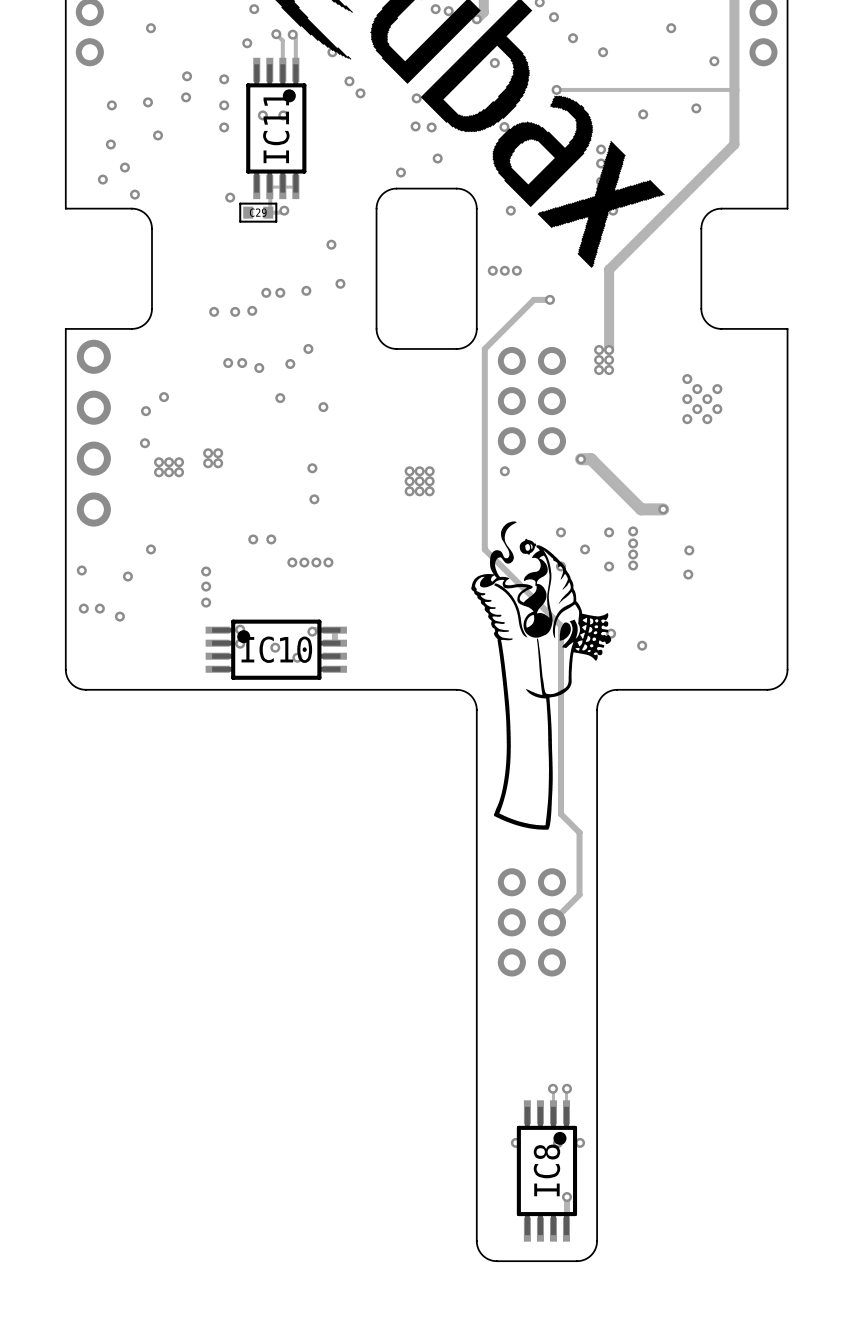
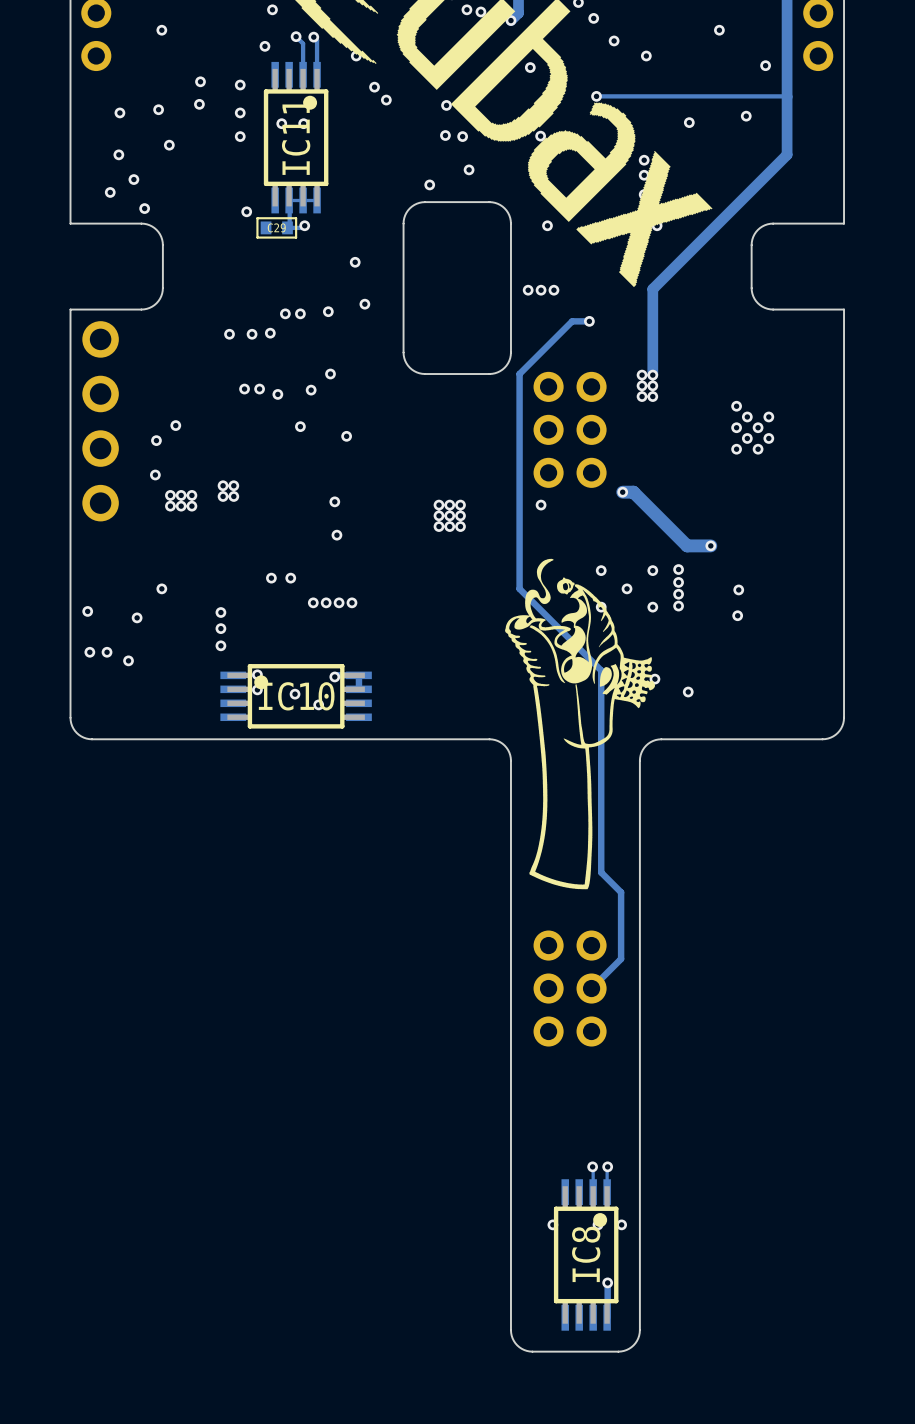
board edge: (151, 268) (151, 311) (149, 318) (144, 324) (131, 328) (65, 328) -> (162, 288) (158, 301) (146, 308) (70, 309) (70, 352)
board edge: (701, 268) (701, 311) (704, 318) (709, 324) (721, 328) (787, 328) -> (751, 288) (756, 301) (767, 308) (844, 309) (844, 352)
part position: (93, 433) -> (100, 421)

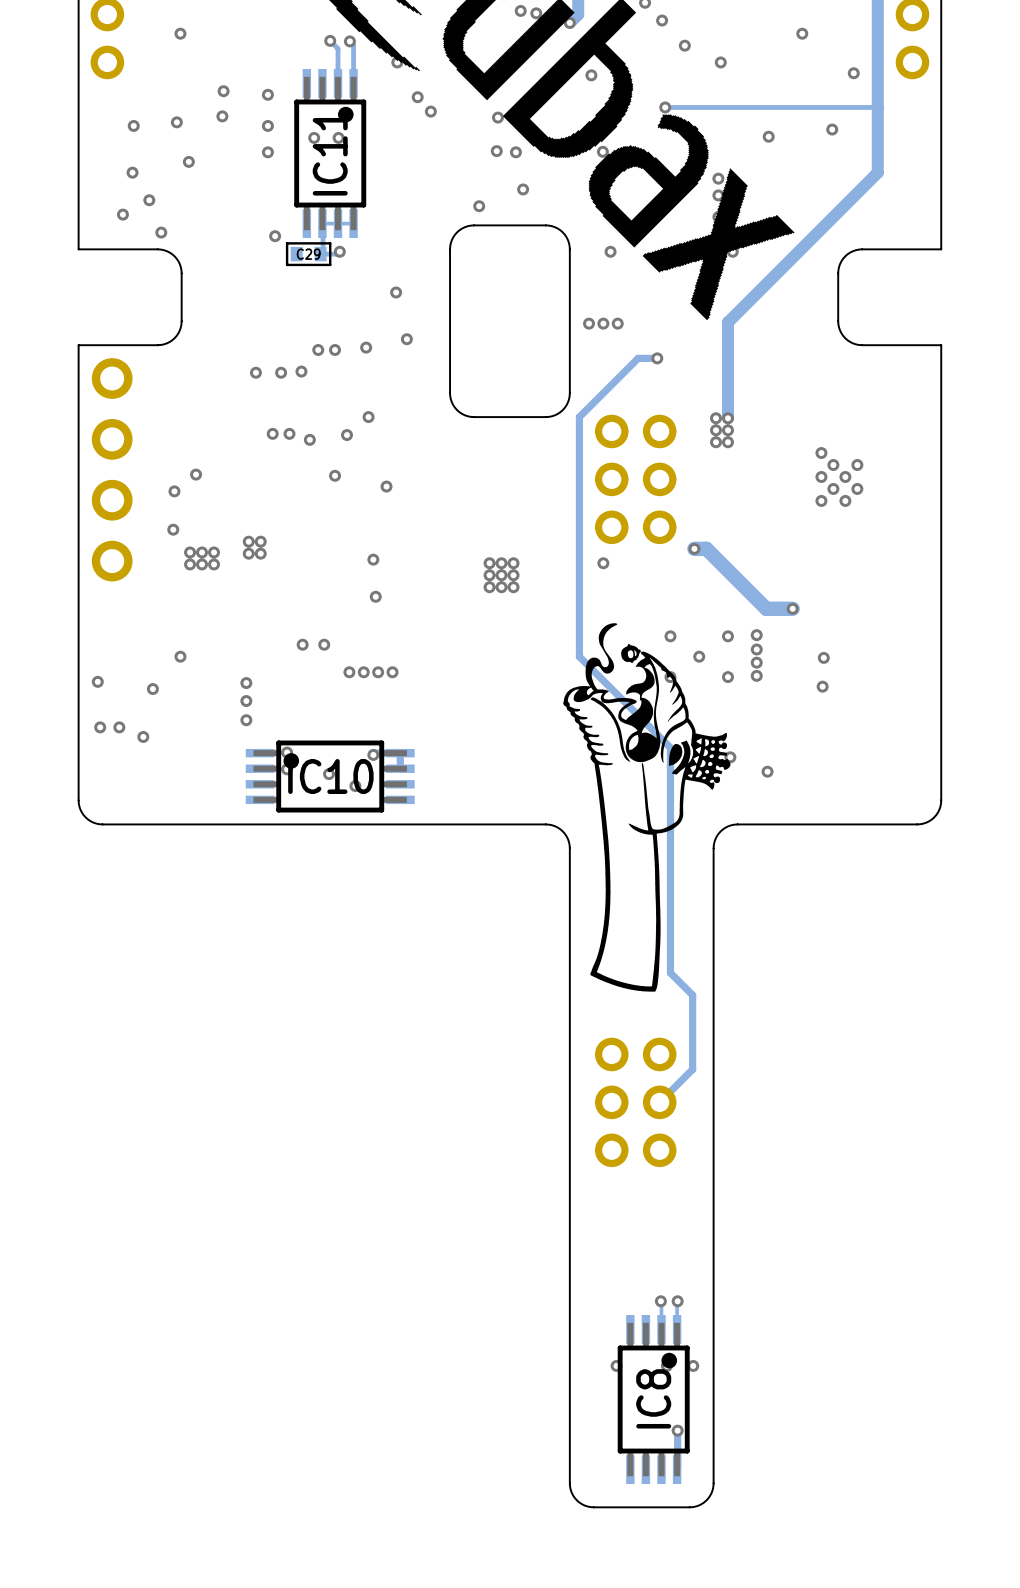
via: (272, 9) -> none
via: (264, 46) -> none

